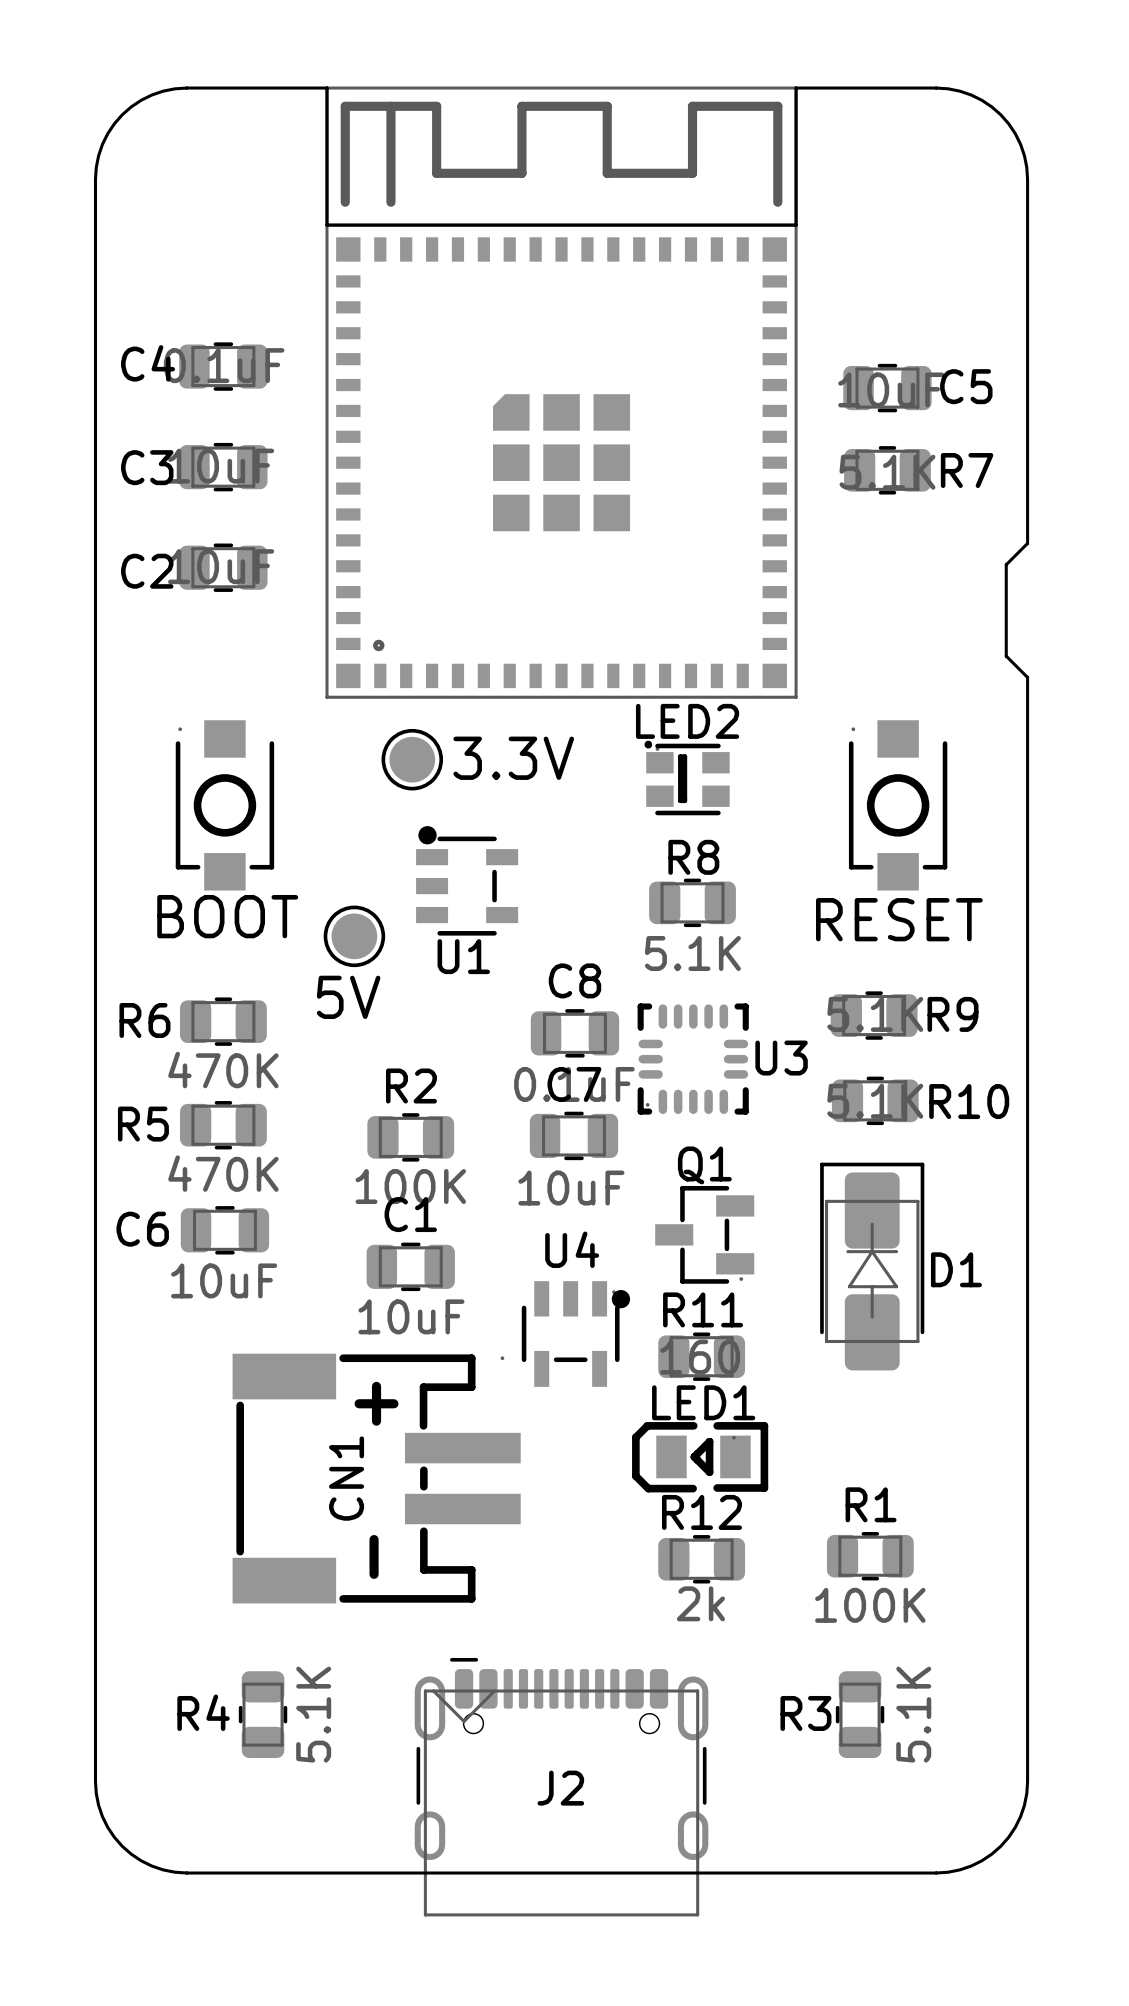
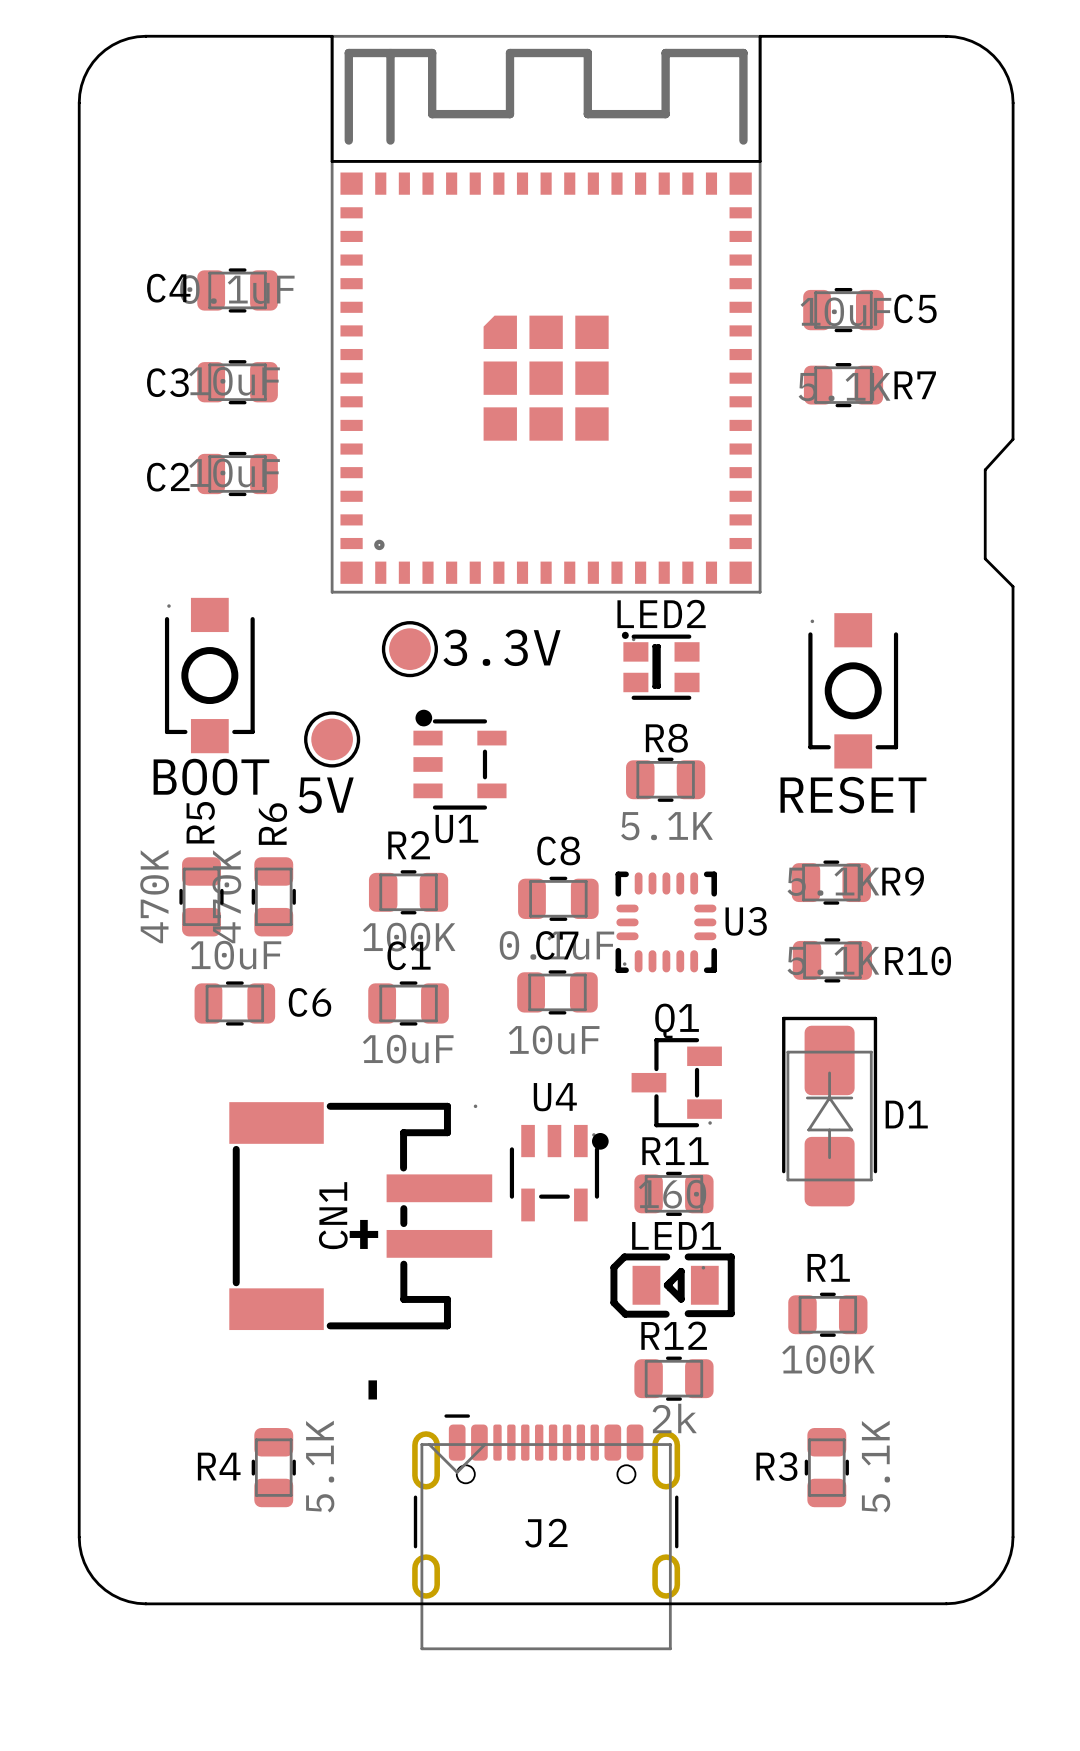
board edge: (326, 88) (186, 88) (163, 91) (151, 94) (131, 106) (114, 123) (102, 144) (96, 167) (95, 1781) (98, 1805) (107, 1827) (114, 1837) (131, 1854) (141, 1860) (163, 1869) (174, 1872) (948, 1872) (971, 1866) (991, 1854) (1008, 1837) (1020, 1816) (1024, 1805) (1027, 1781) (1027, 677) (1006, 656) (1006, 564) (1027, 543) (1027, 179) (1024, 155) (1020, 144) (1008, 123) (1000, 114) (991, 106) (971, 94) (959, 91) (936, 88) -> (332, 36) (145, 36) (128, 38) (112, 45) (98, 55) (88, 69) (79, 94) (79, 1537) (84, 1562) (98, 1584) (120, 1598) (137, 1603) (946, 1603) (963, 1601) (979, 1594) (993, 1584) (1007, 1562) (1013, 1537) (1013, 586) (985, 558) (985, 469) (1013, 439) (1012, 94) (1008, 77) (999, 62) (987, 50) (971, 41) (946, 36) (887, 36)
part position: (224, 805) -> (209, 675)
part position: (354, 936) -> (332, 739)
R6 rotation: 0° (223, 1021) -> 90° clockwise (273, 896)
R5 rotation: 0° (223, 1125) -> 90° clockwise (201, 896)
R5 position: (223, 1125) -> (201, 896)
R2 position: (410, 1137) -> (408, 892)
C6 name position: C6 (142, 1229) -> C6 (310, 1002)
C6 position: (224, 1230) -> (234, 1003)
C1 position: (410, 1266) -> (408, 1003)
C6 value position: 10uF (224, 1280) -> 10uF (235, 955)
CN1 position: (376, 1478) -> (360, 1216)
R1 position: (870, 1556) -> (827, 1314)
R4 position: (263, 1714) -> (273, 1467)
R3 position: (860, 1714) -> (826, 1467)
J2 position: (561, 1787) -> (546, 1532)

